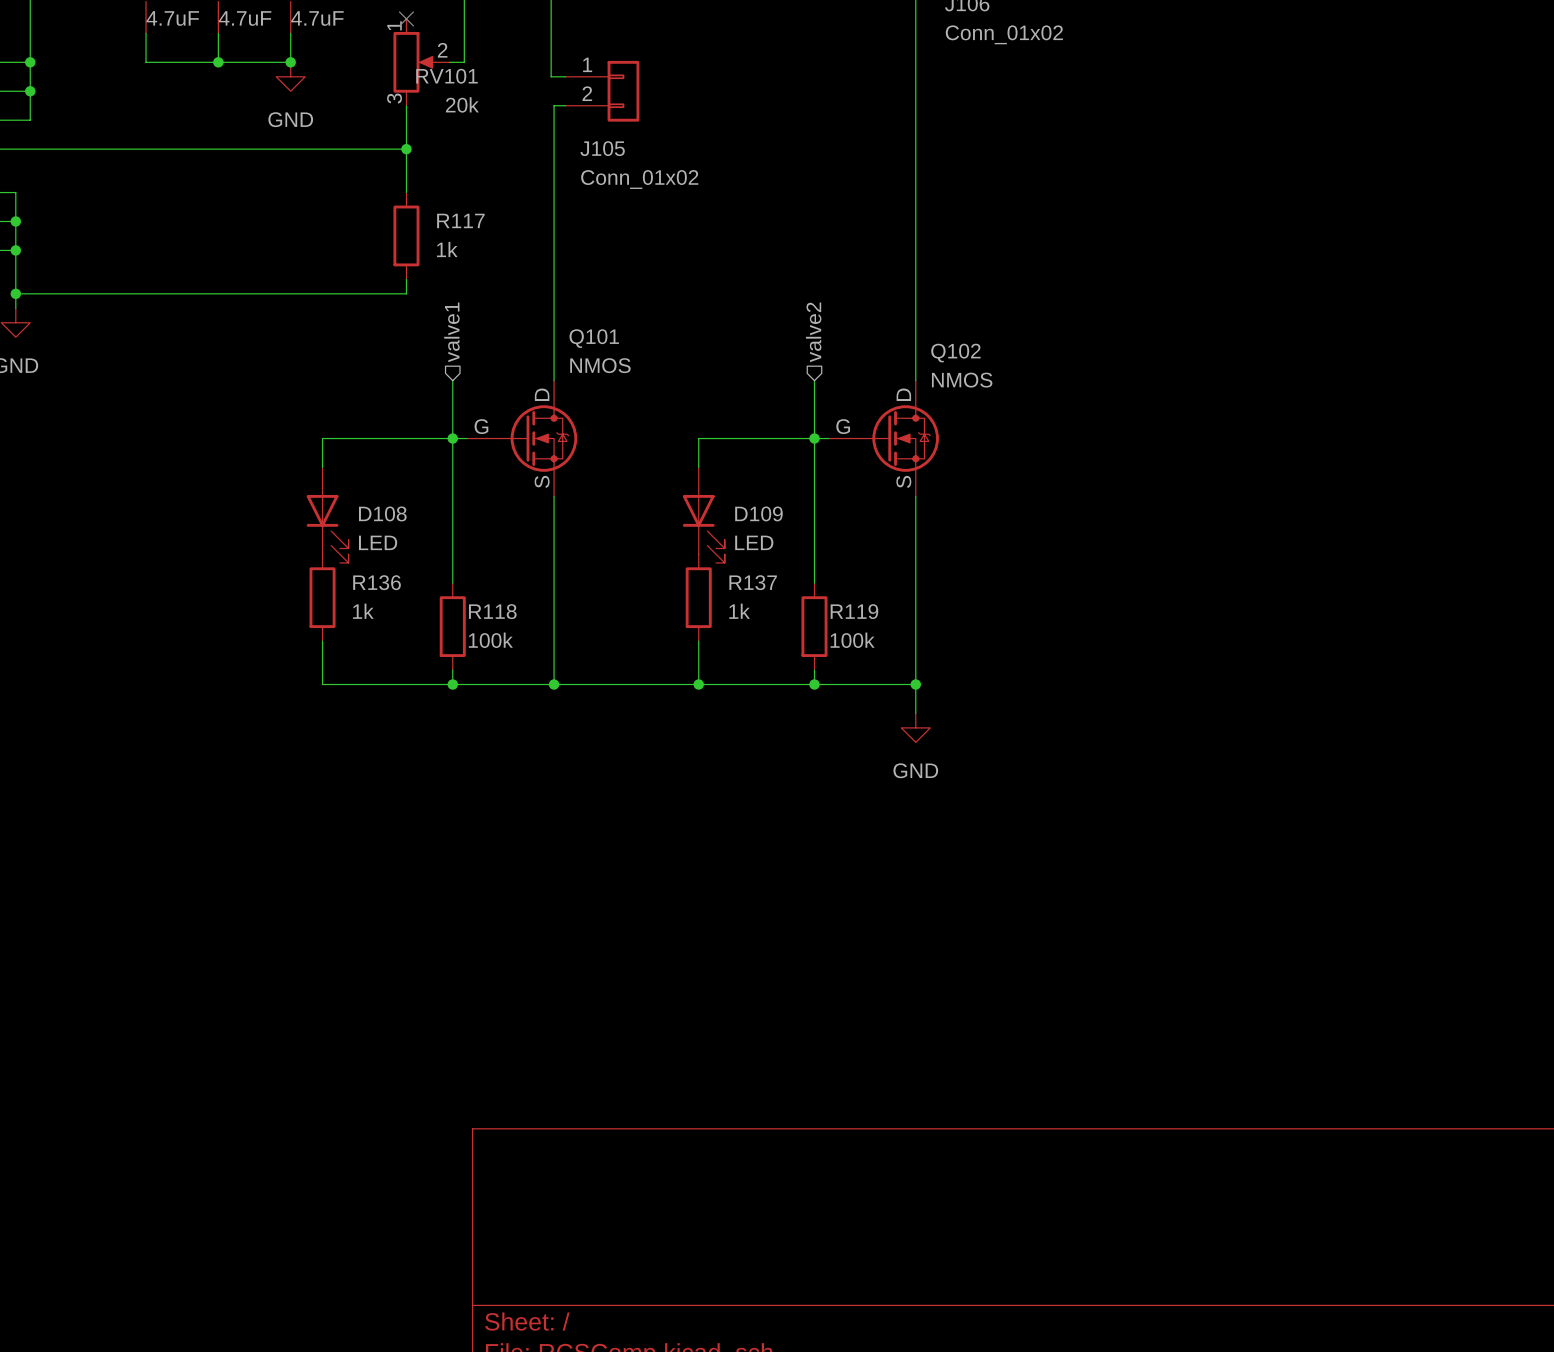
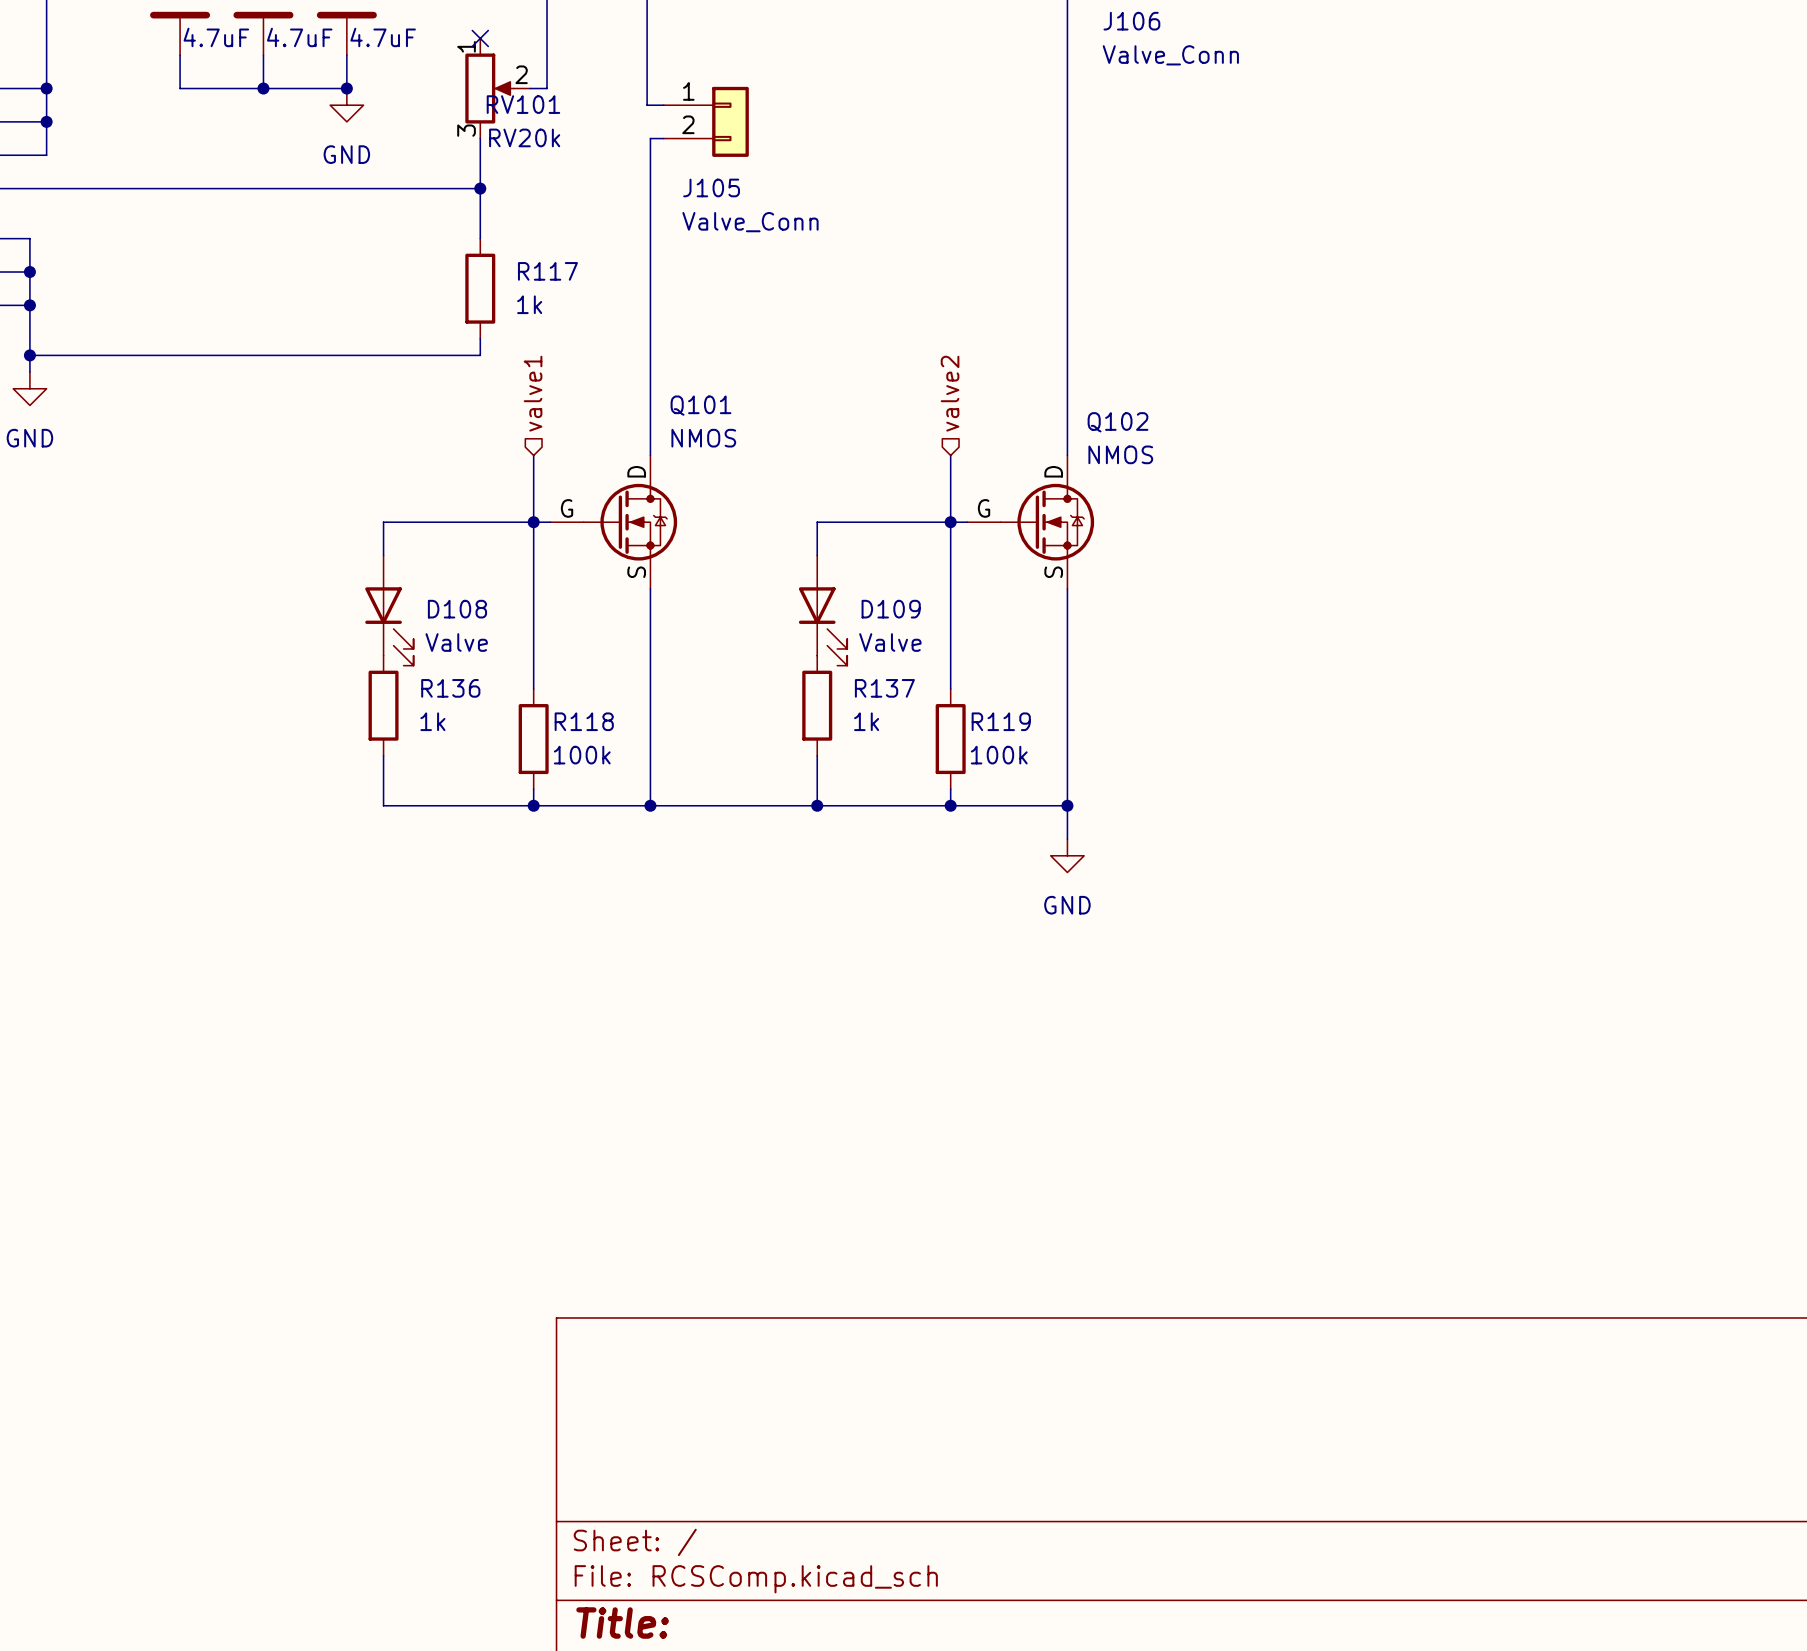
J106 value: Conn_01x02 (1004, 34) -> Valve_Conn (1170, 55)
RV101 value: 20k (462, 104) -> RV20k (524, 137)
J105 value: Conn_01x02 (639, 179) -> Valve_Conn (750, 222)
D108 value: LED (378, 542) -> Valve (456, 642)
D109 value: LED (754, 542) -> Valve (890, 642)

